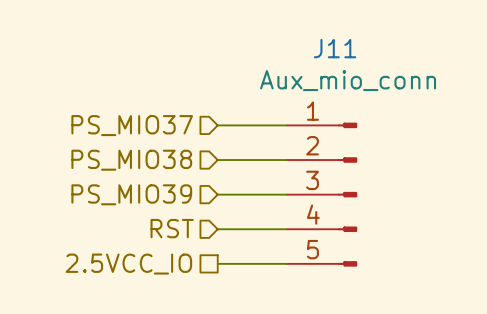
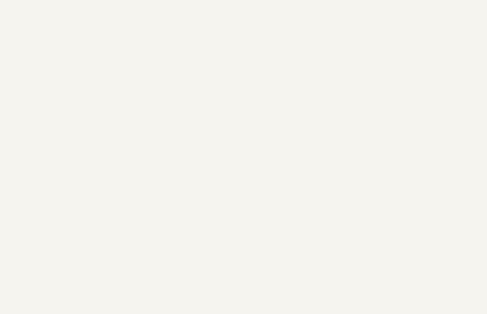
hierarchical label: PS_MIO37 (132, 125) -> none
wire: (217, 125) (286, 125) -> none
hierarchical label: PS_MIO38 (131, 160) -> none
wire: (217, 160) (286, 160) -> none
hierarchical label: PS_MIO39 (131, 194) -> none
wire: (217, 194) (286, 194) -> none
J11: Aux_mio_conn (322, 194) -> none
hierarchical label: RST (172, 228) -> none
wire: (217, 229) (286, 229) -> none
wire: (217, 263) (286, 263) -> none
hierarchical label: 2.5VCC_IO (128, 264) -> none

